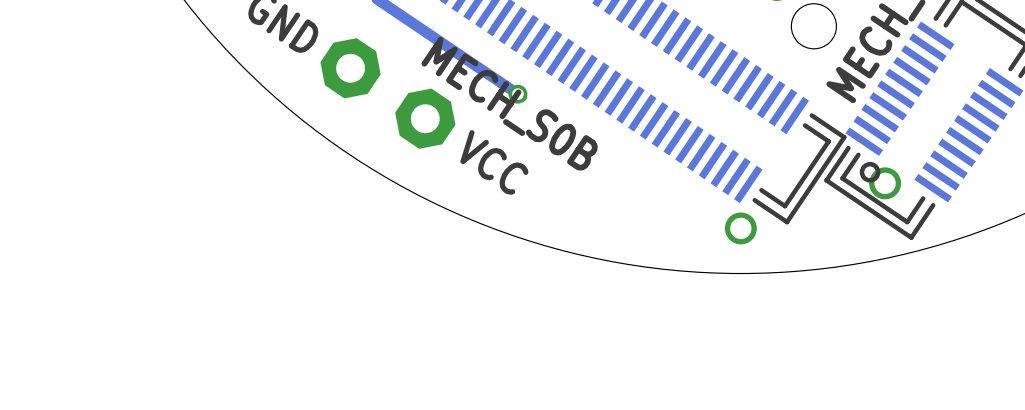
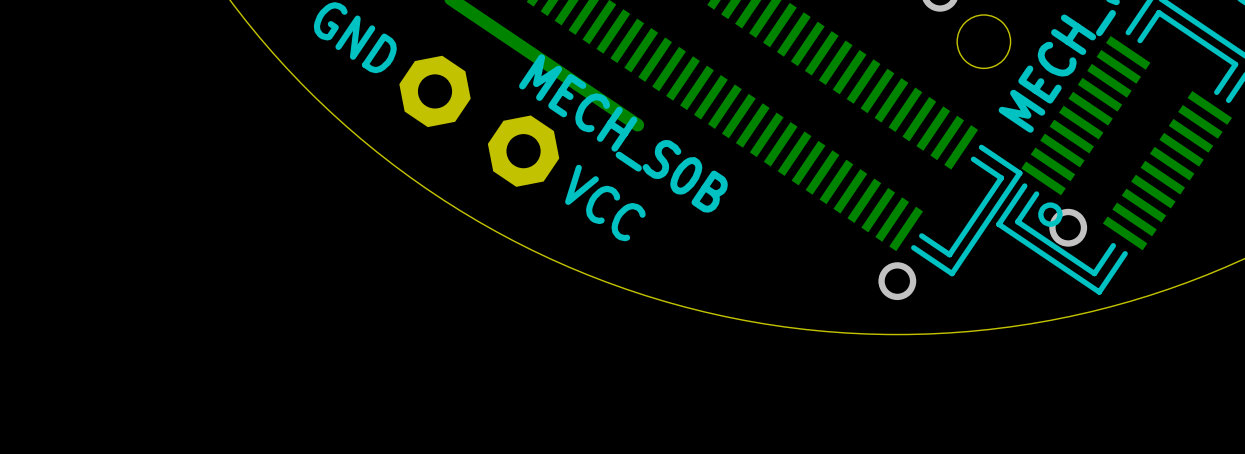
via: (517, 94) -> none

